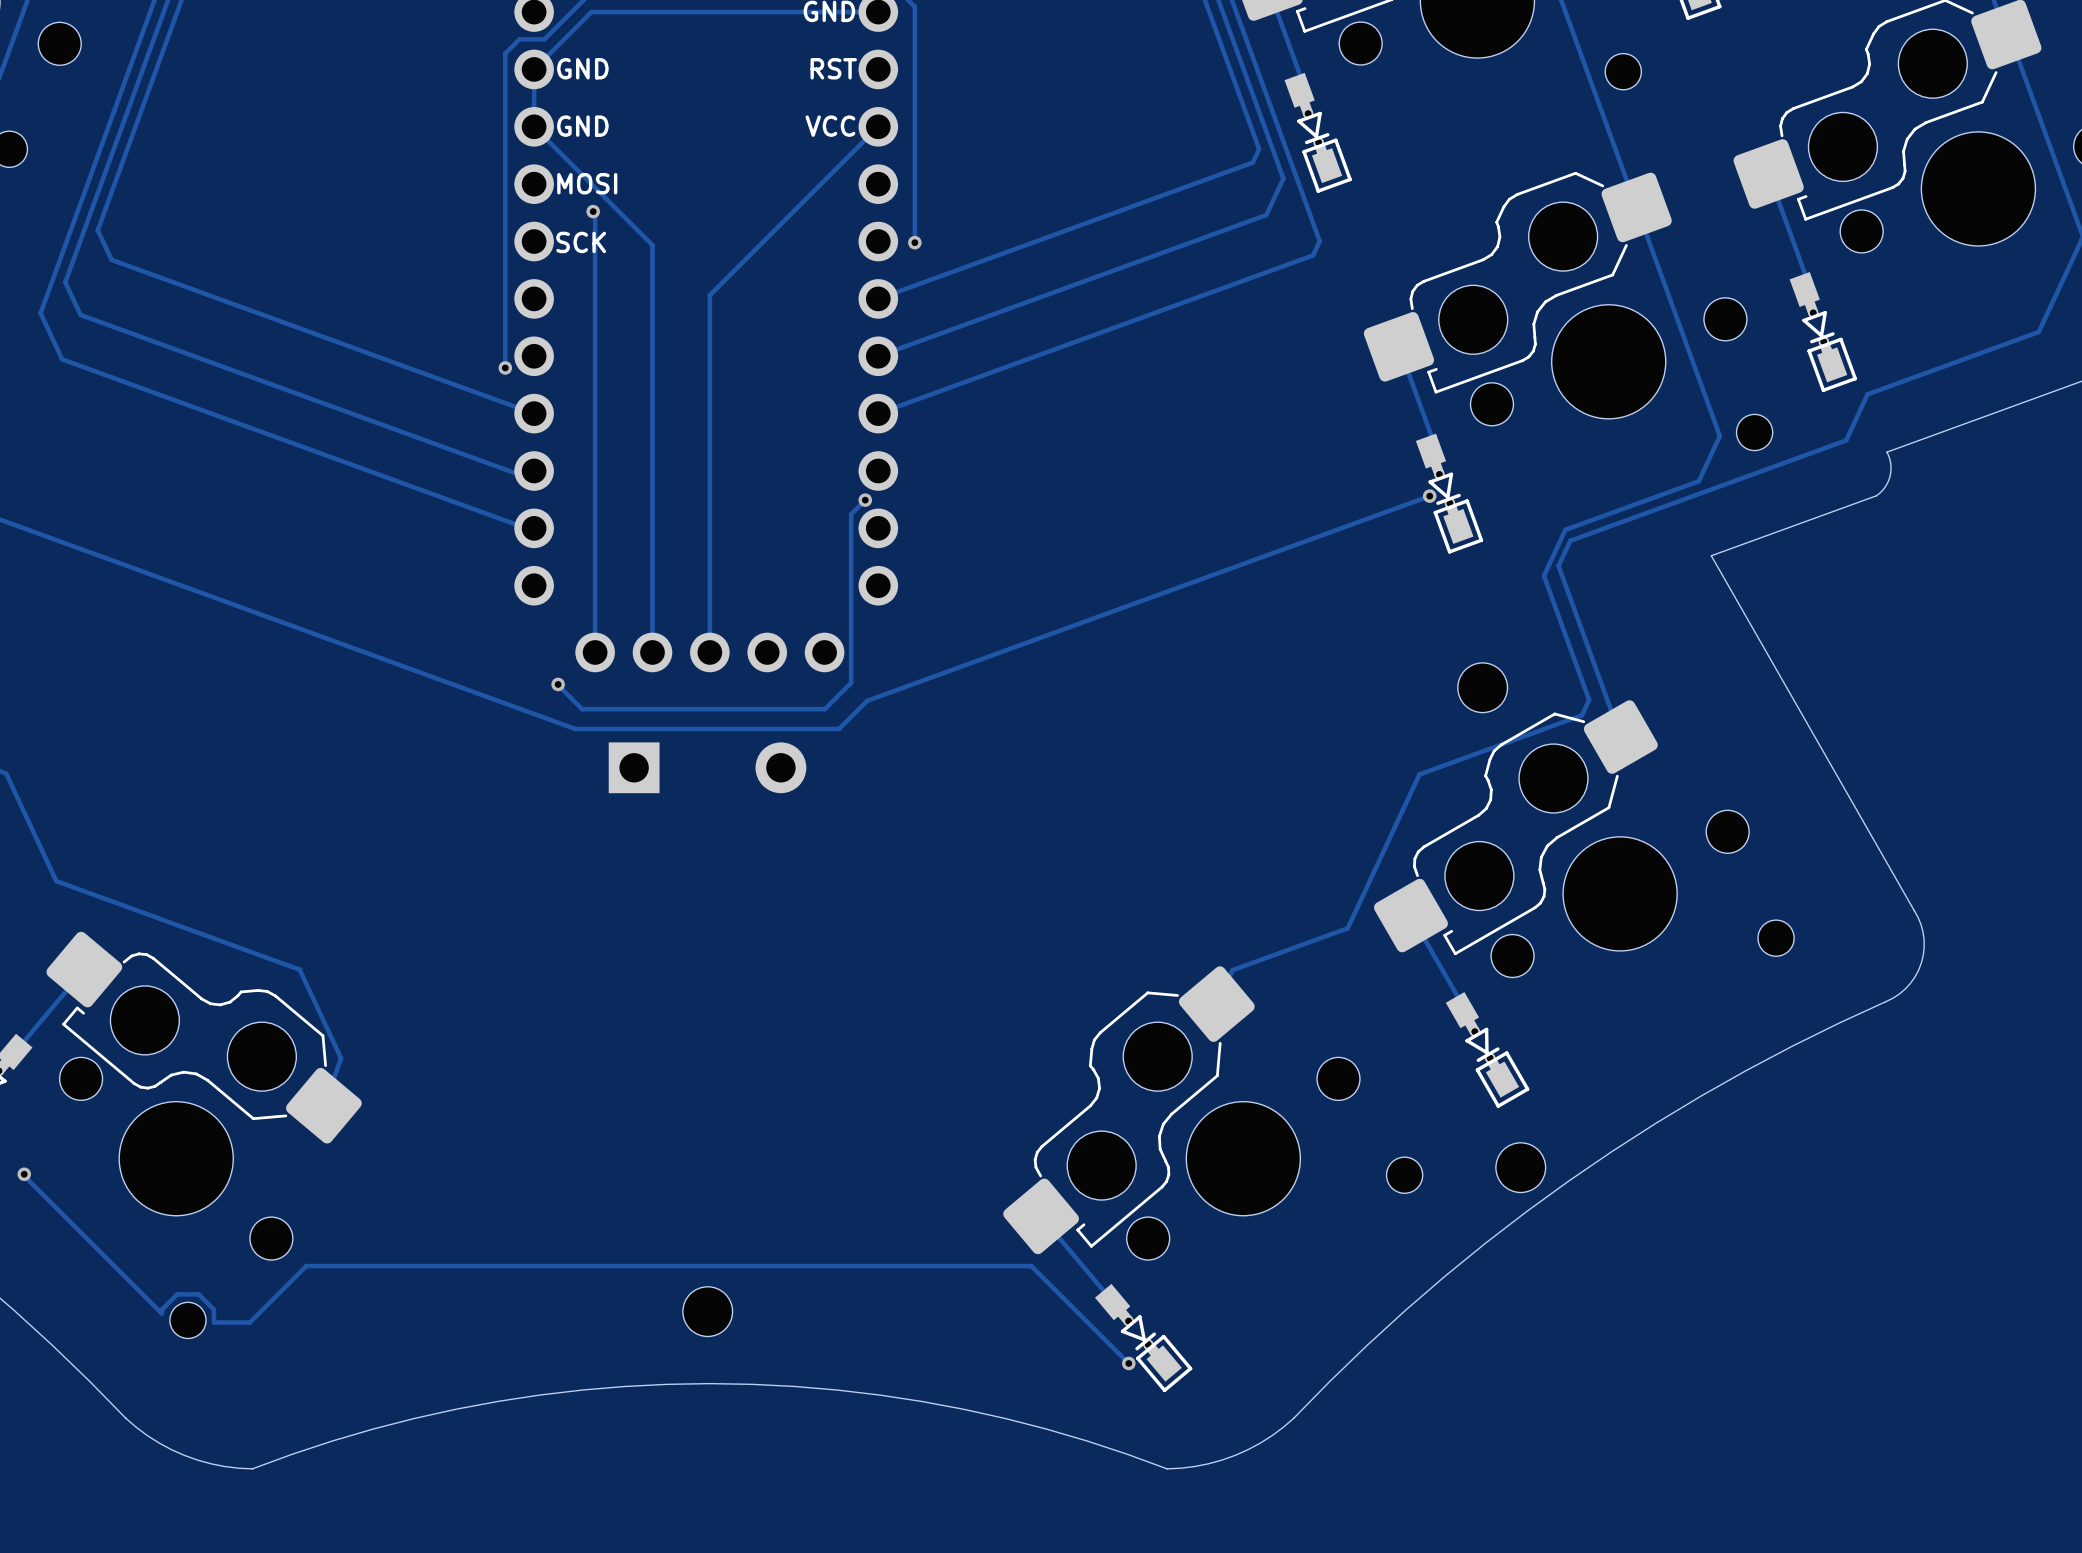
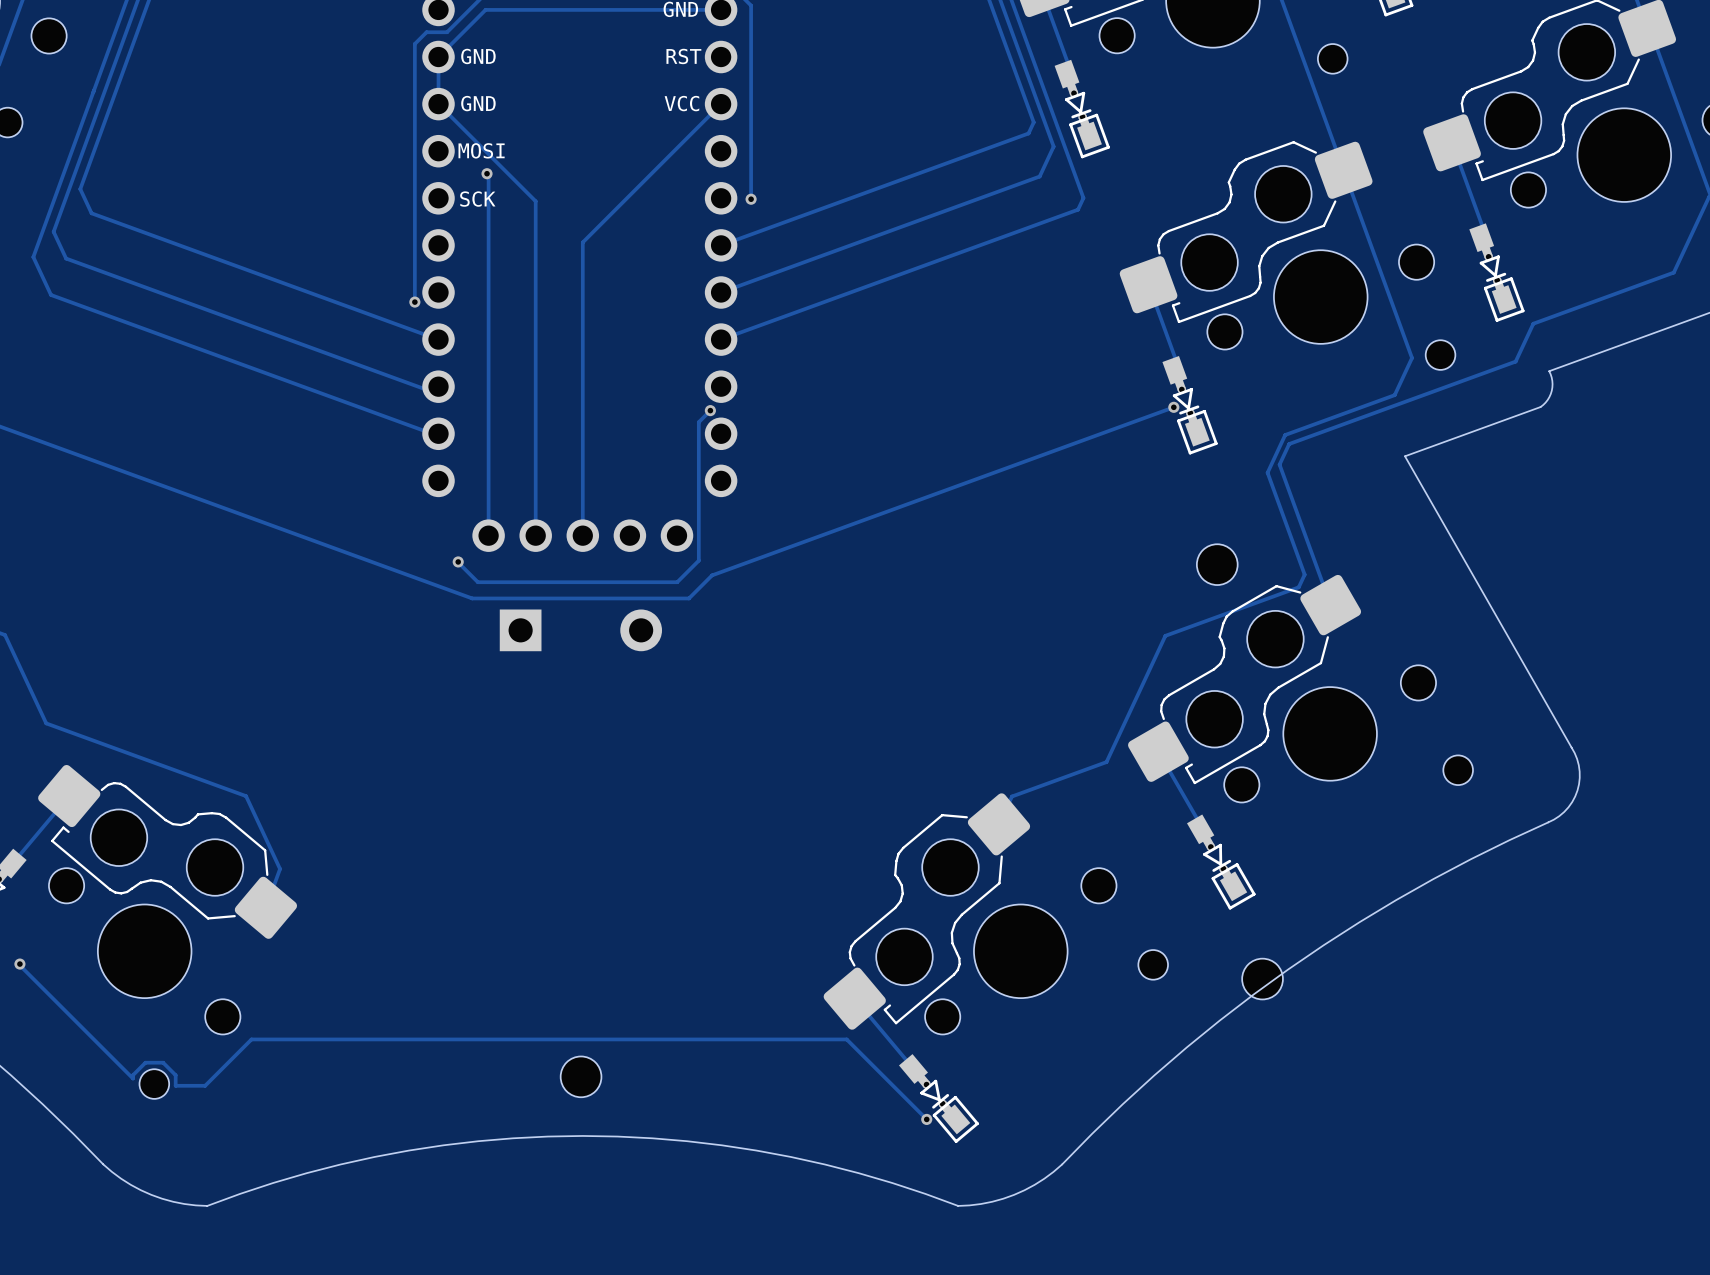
part position: (1520, 1167) -> (1262, 979)

